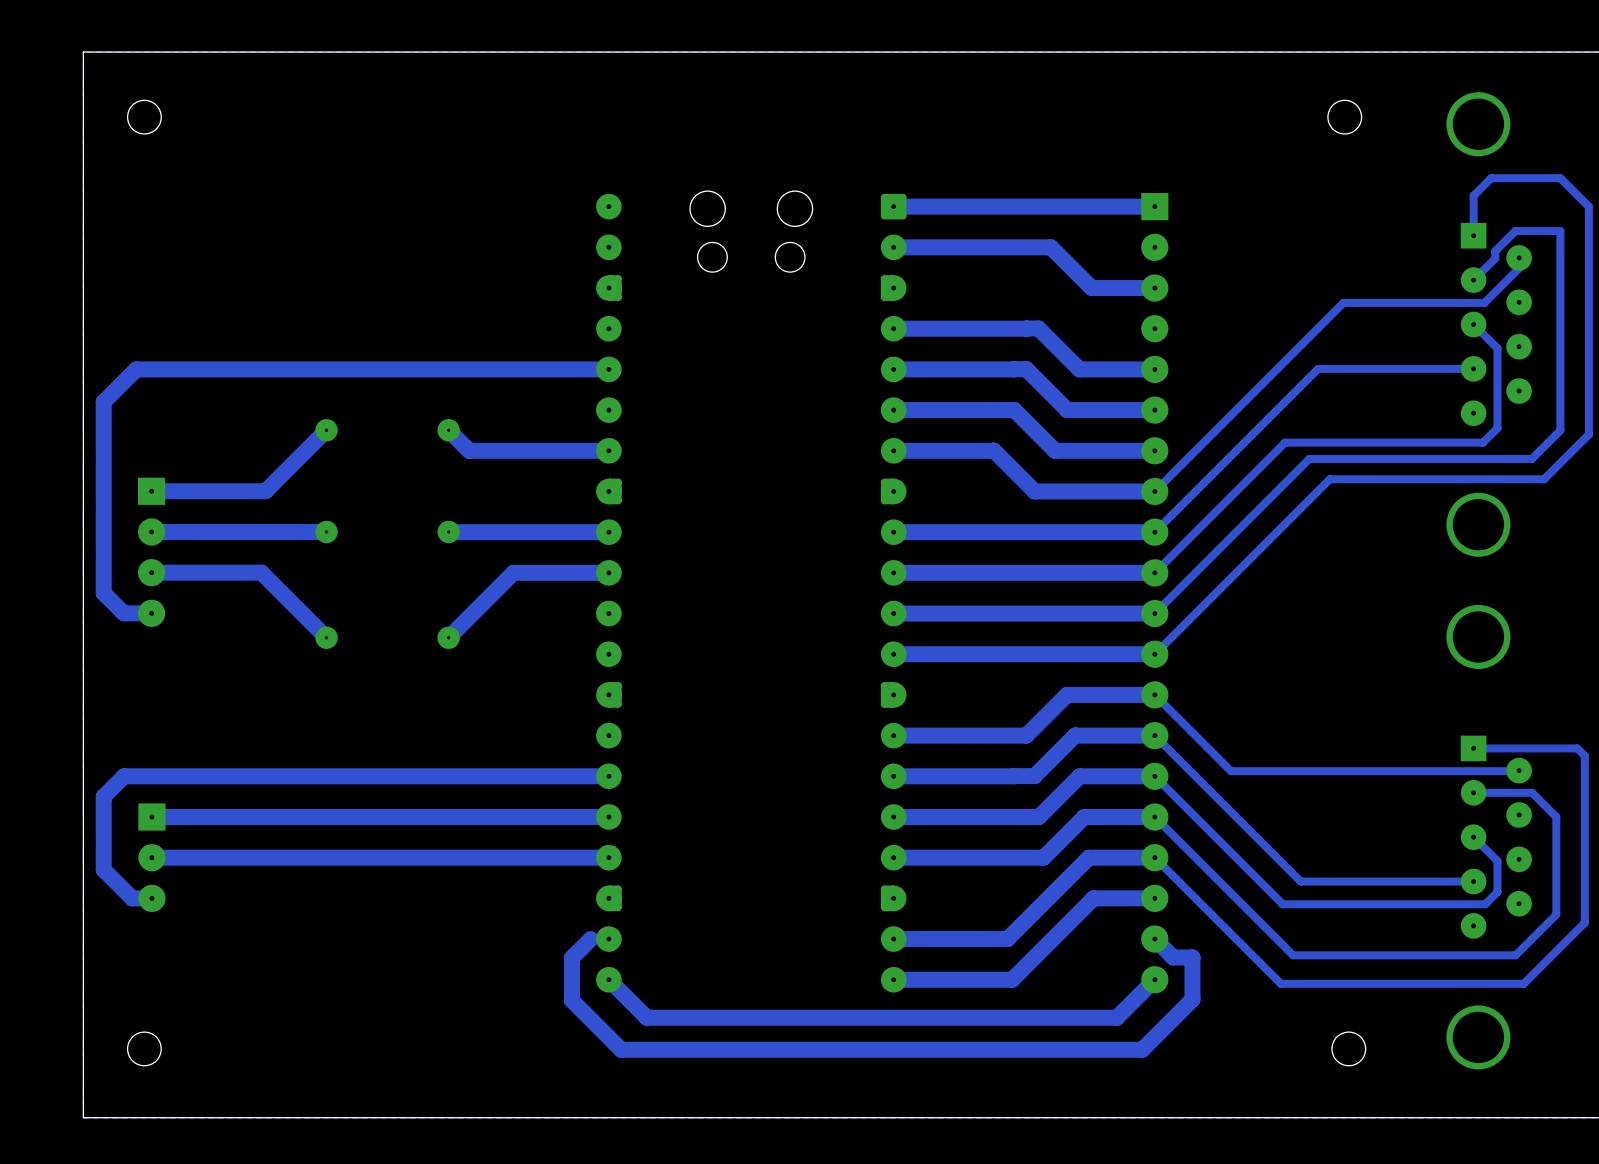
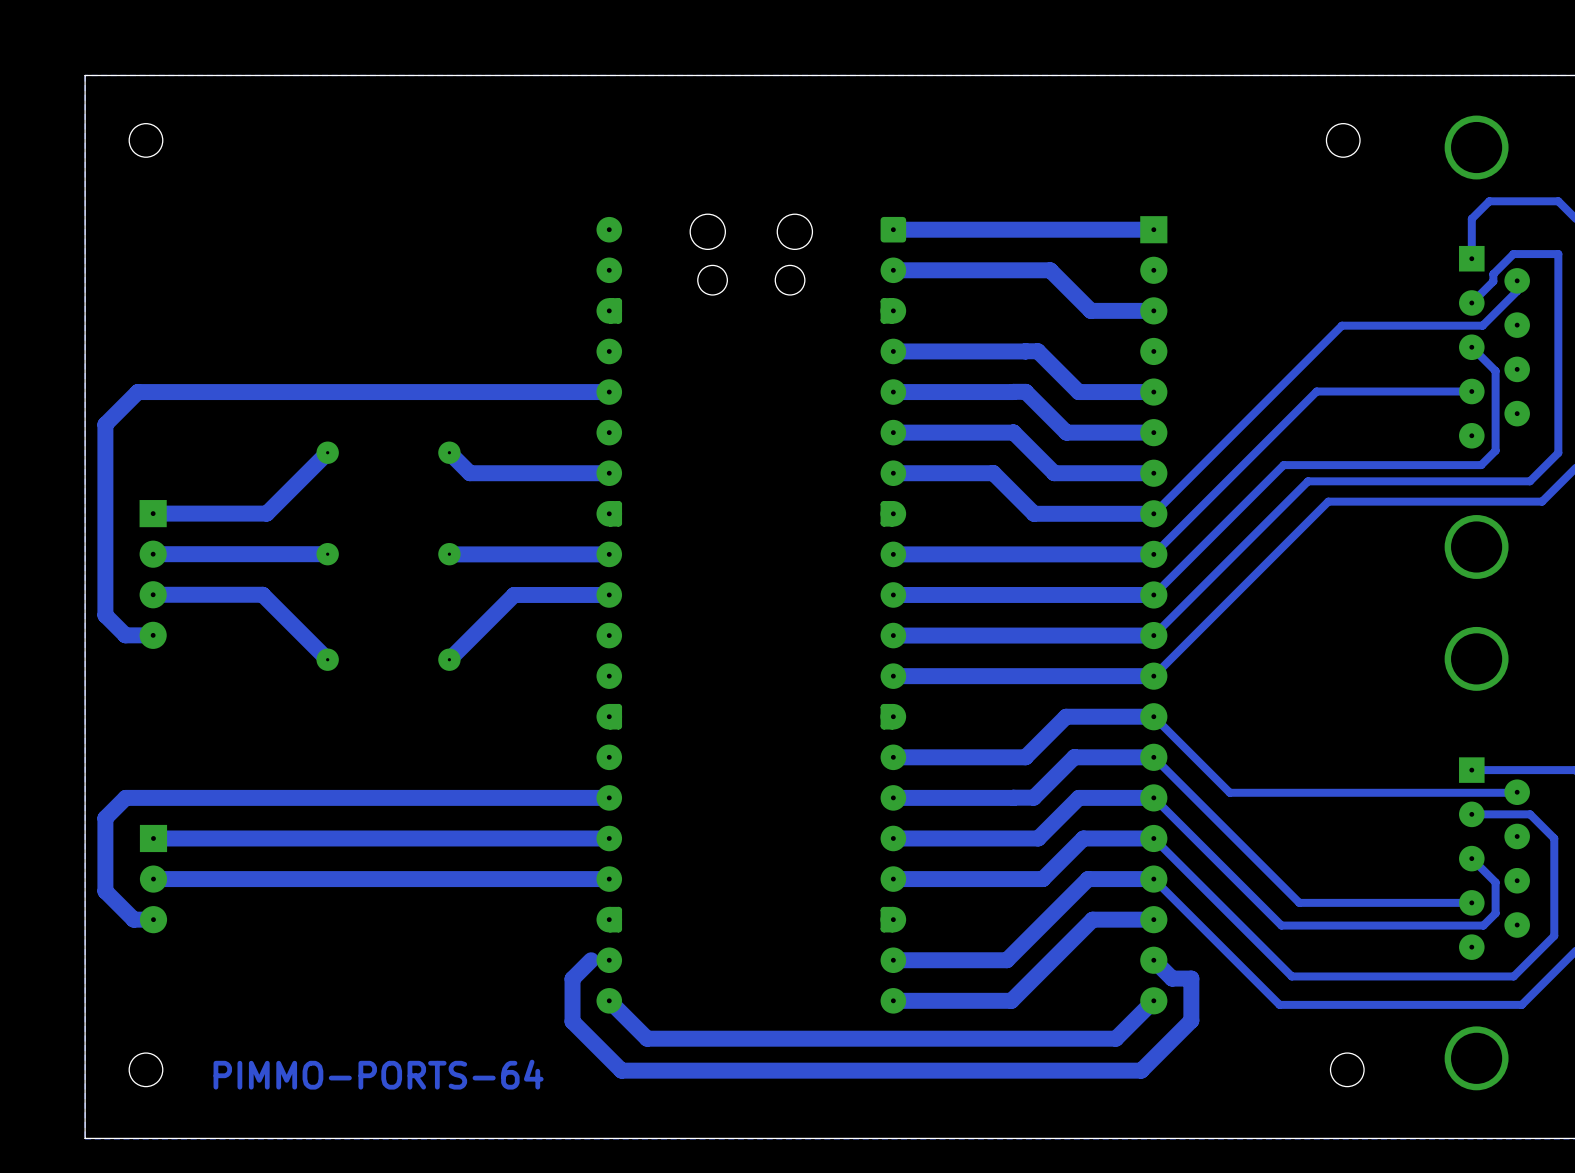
text: none -> PIMMO-PORTS-64 (378, 1074)

